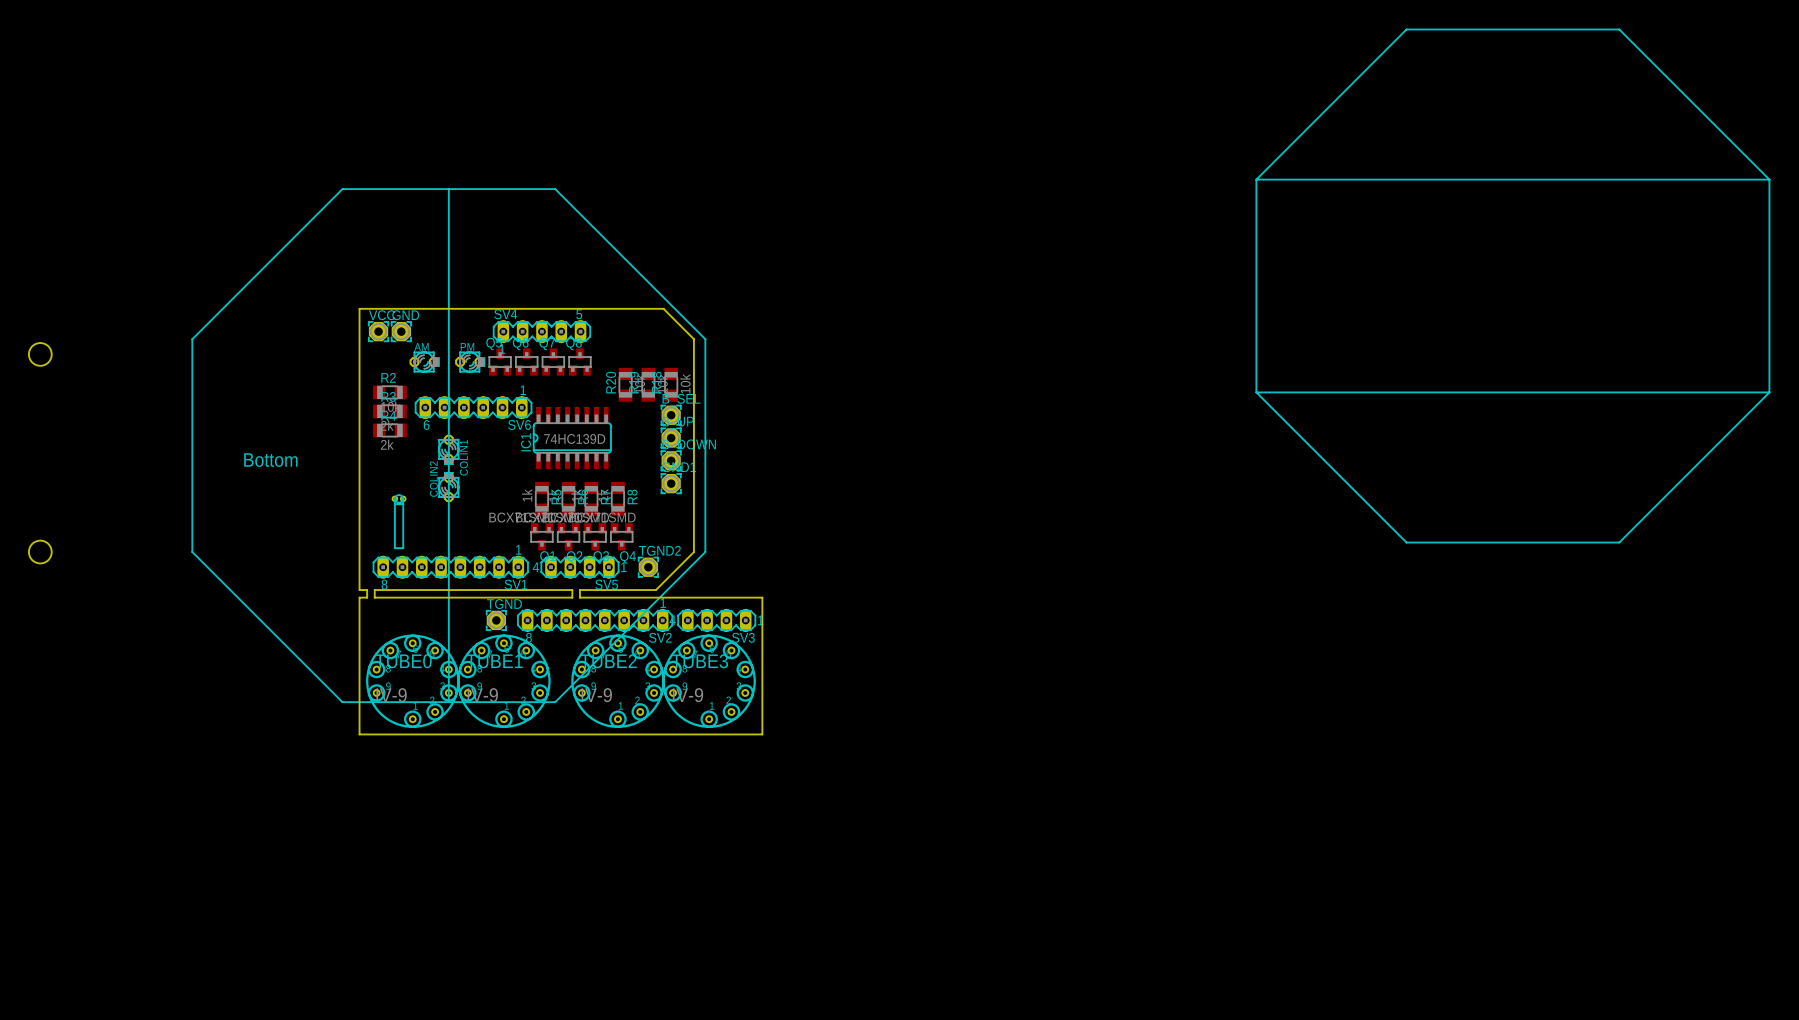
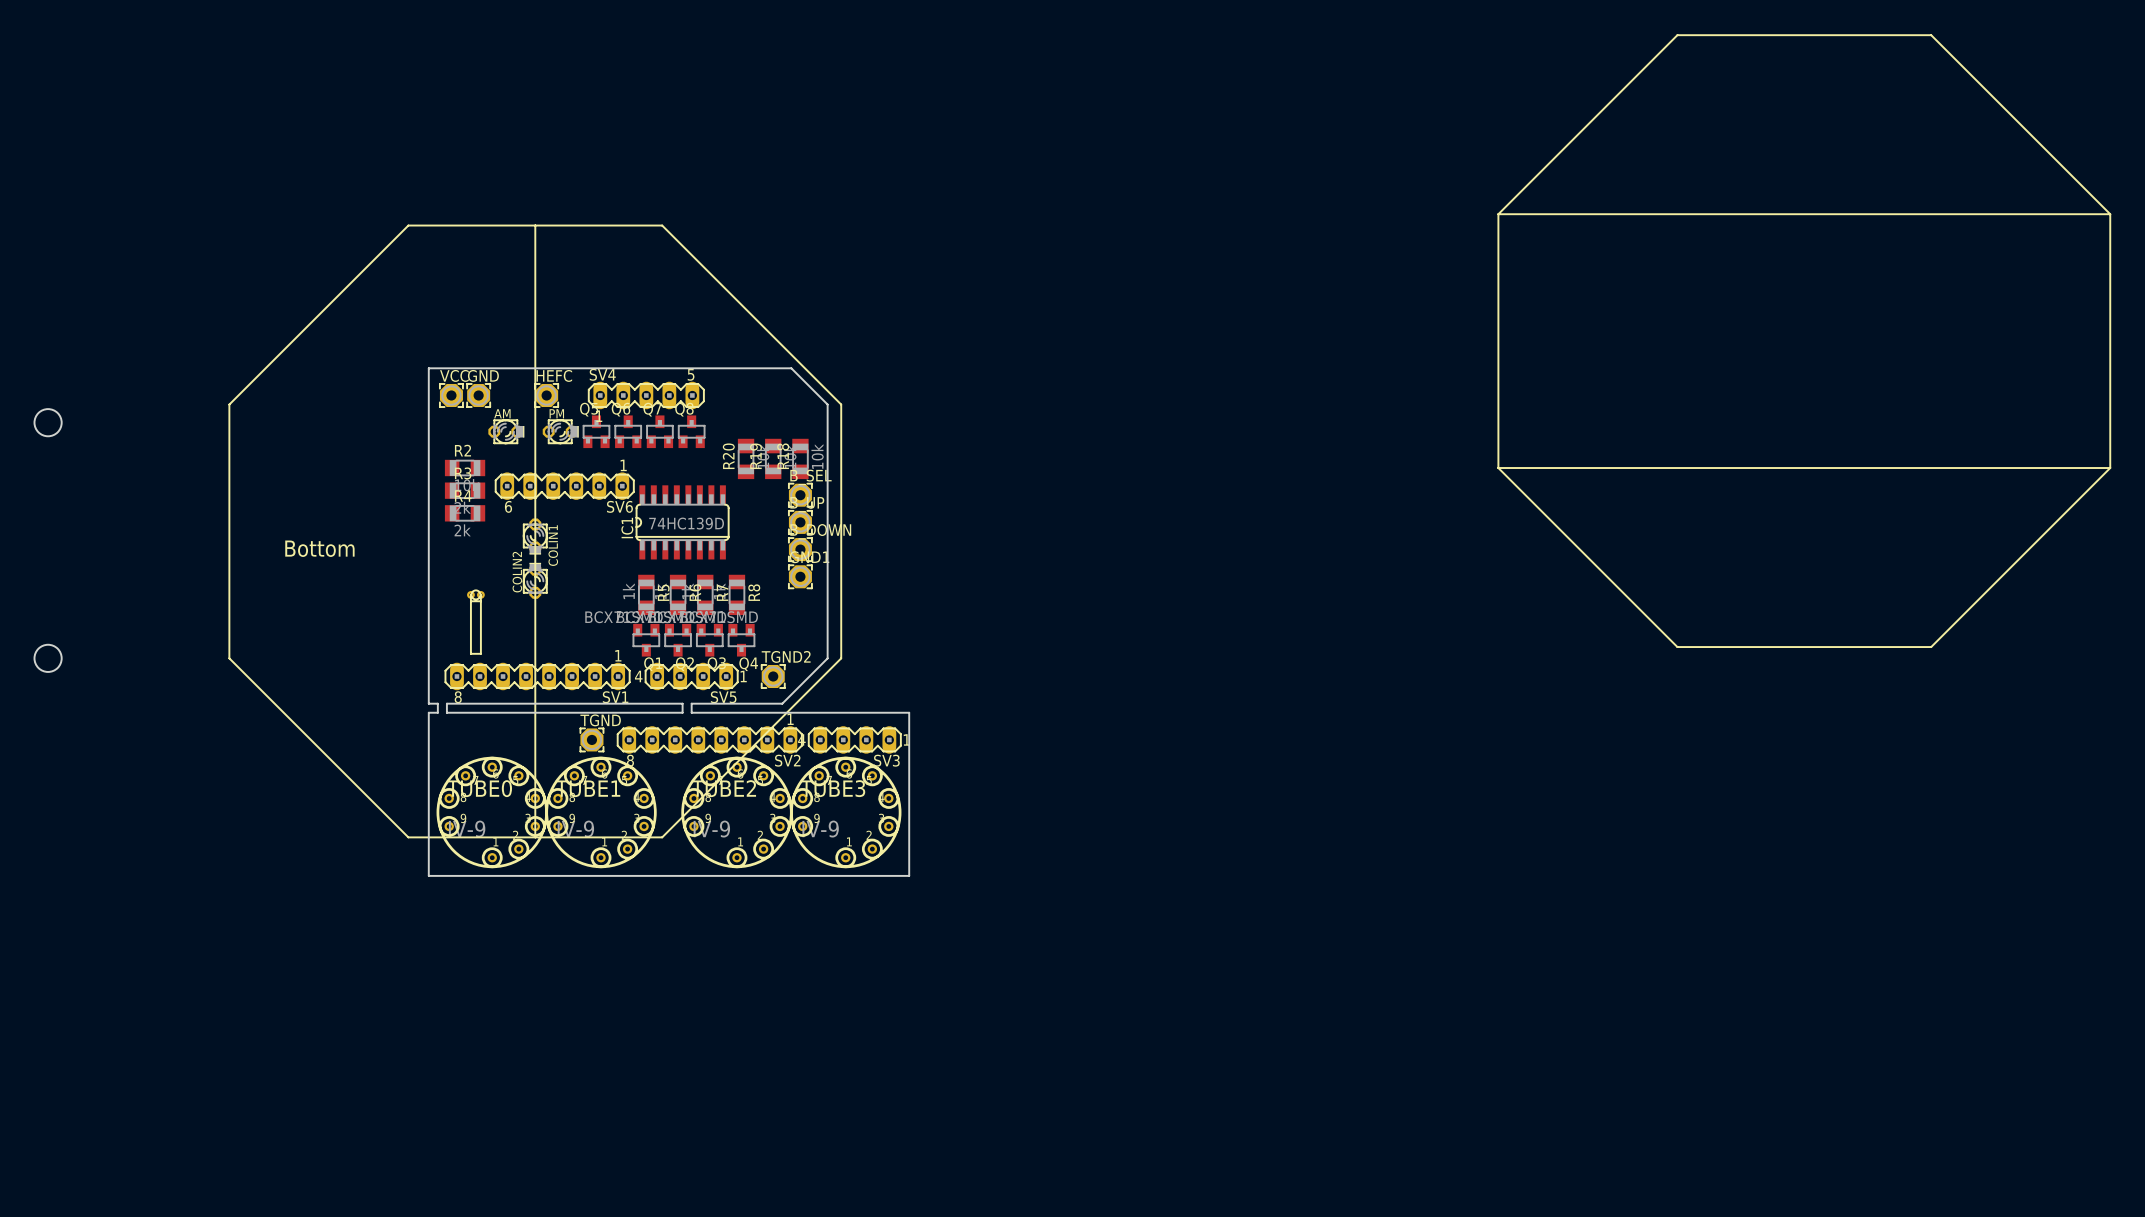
HEFC: none -> (546, 395)

